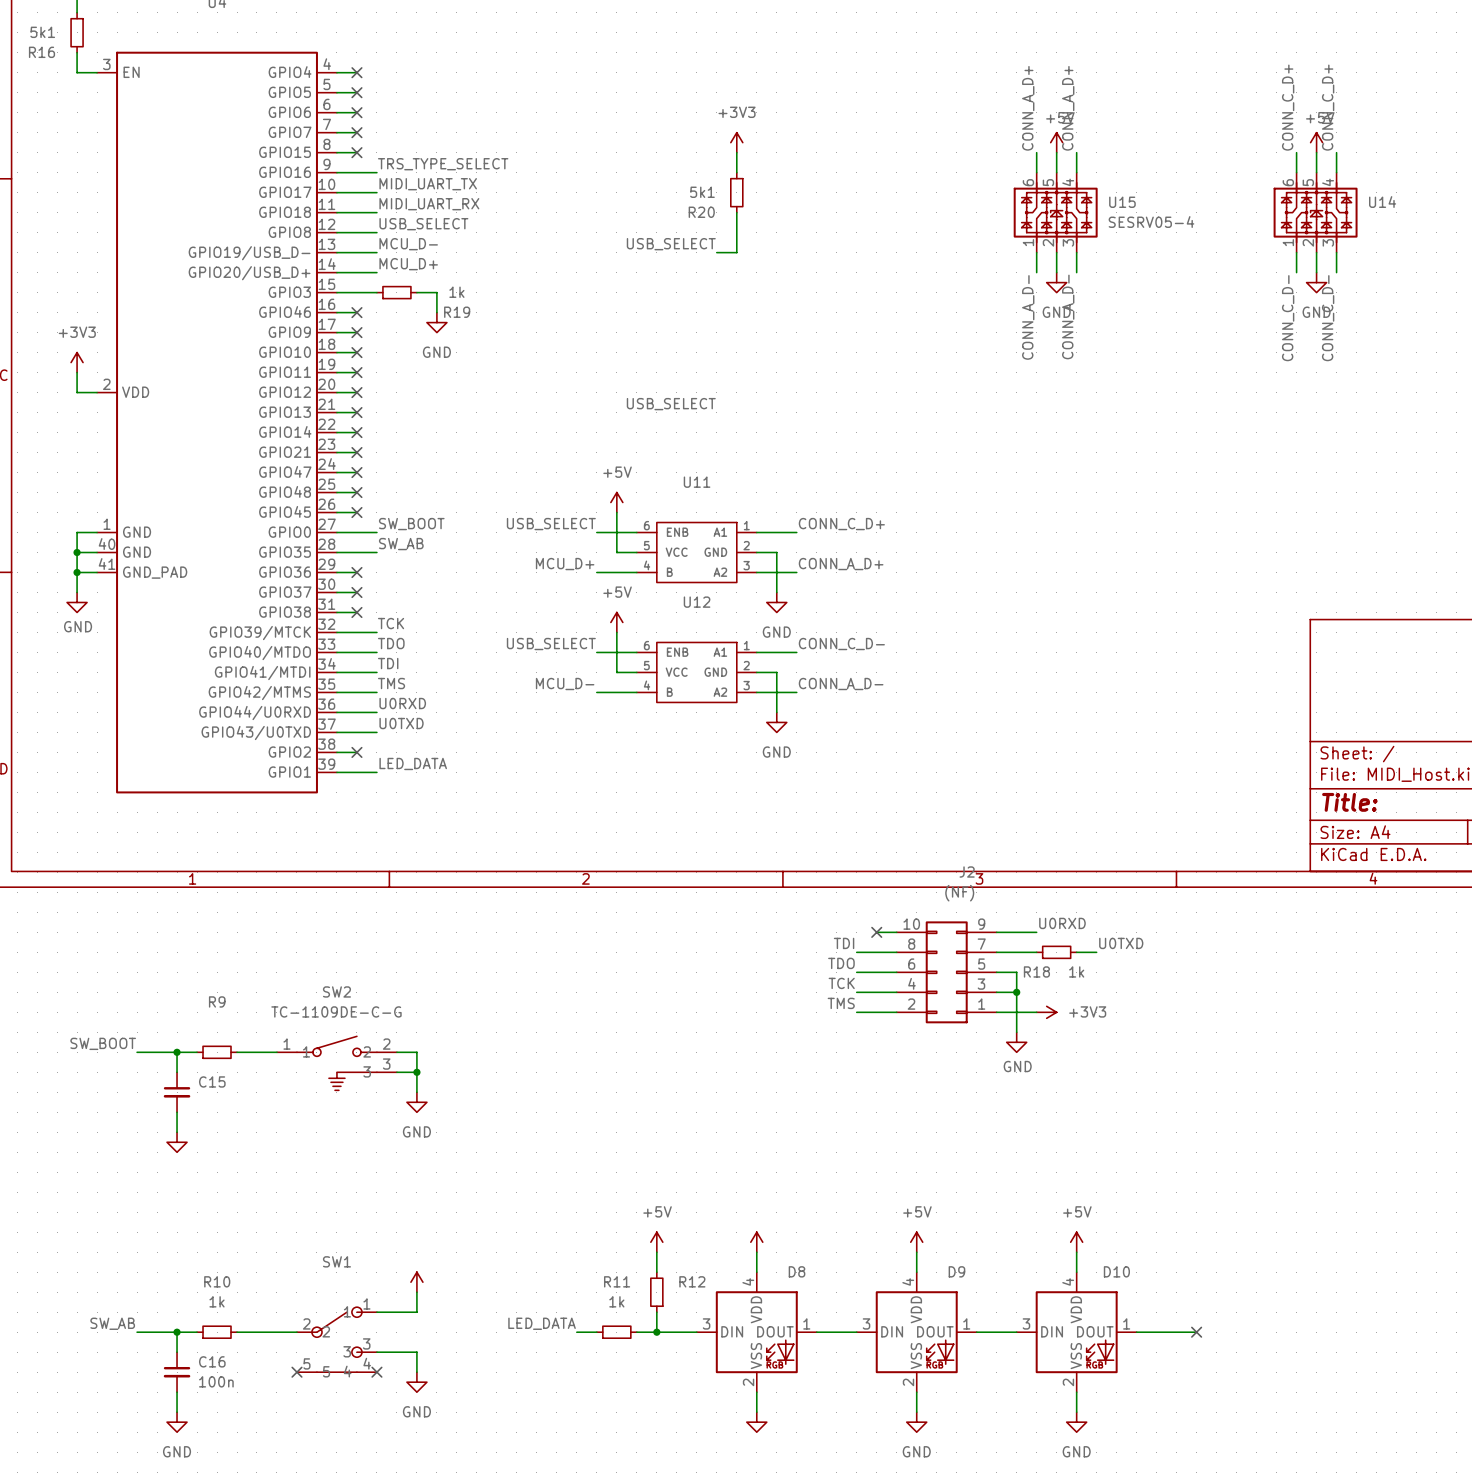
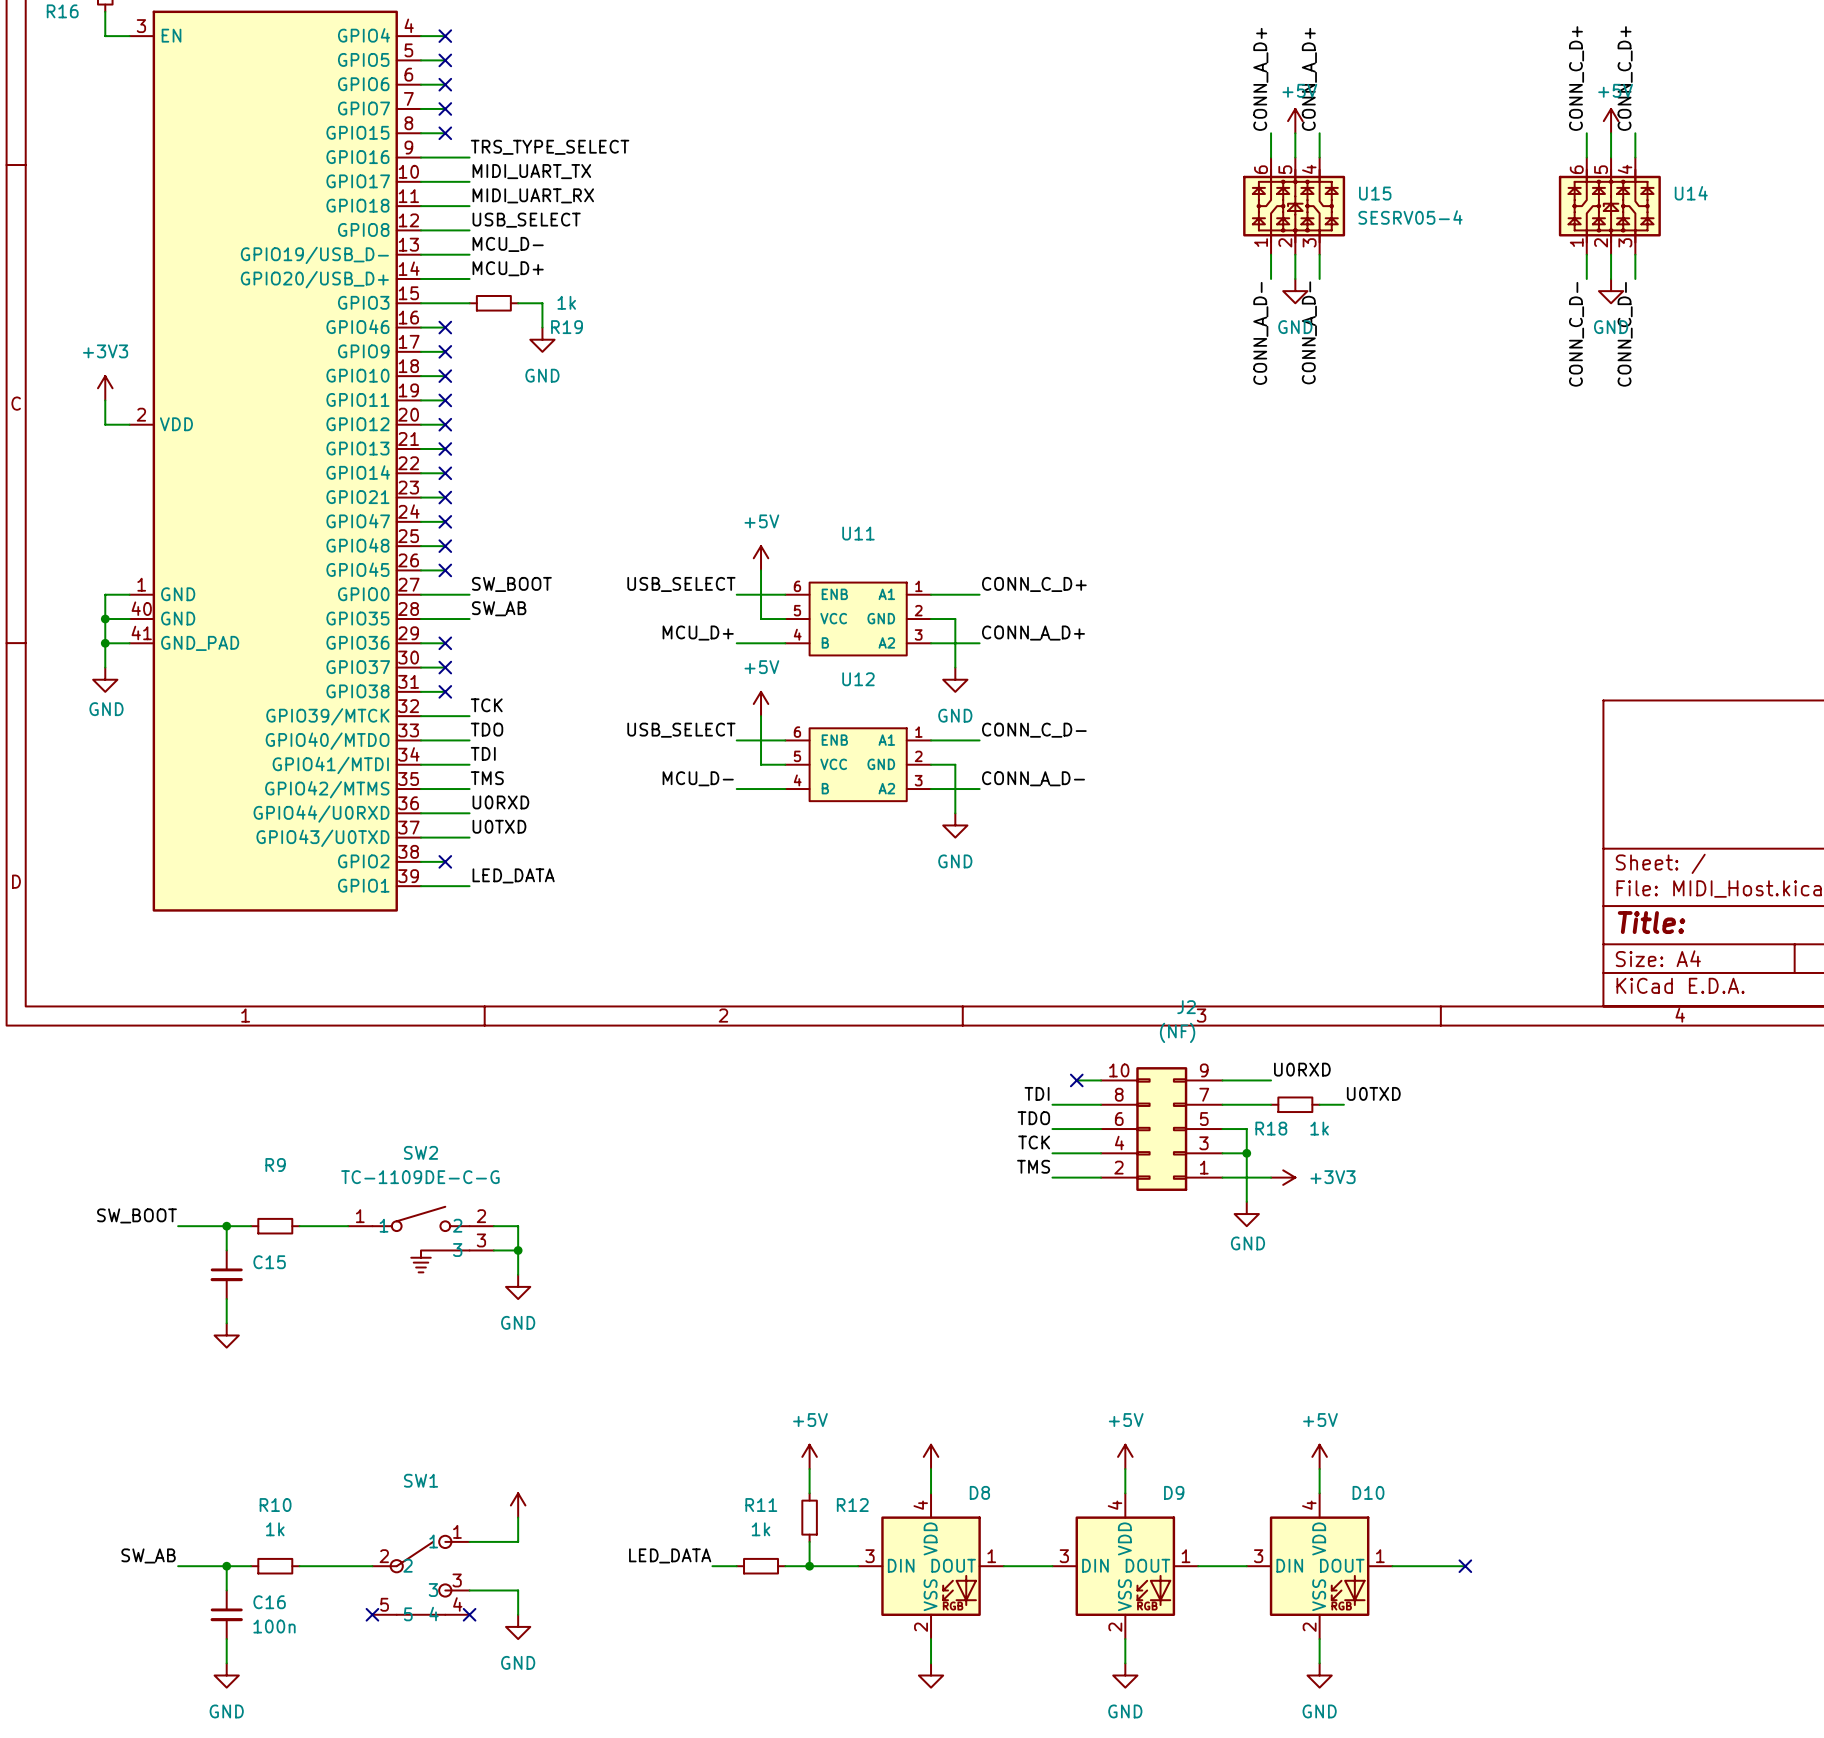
power symbol: +3V3 (736, 142) -> none
wire: (736, 152) (736, 172) -> none
R20: 5k1 (736, 192) -> none
wire: (736, 212) (736, 252) (716, 252) -> none
label: USB_SELECT (671, 244) -> none
label: USB_SELECT (671, 404) -> none

